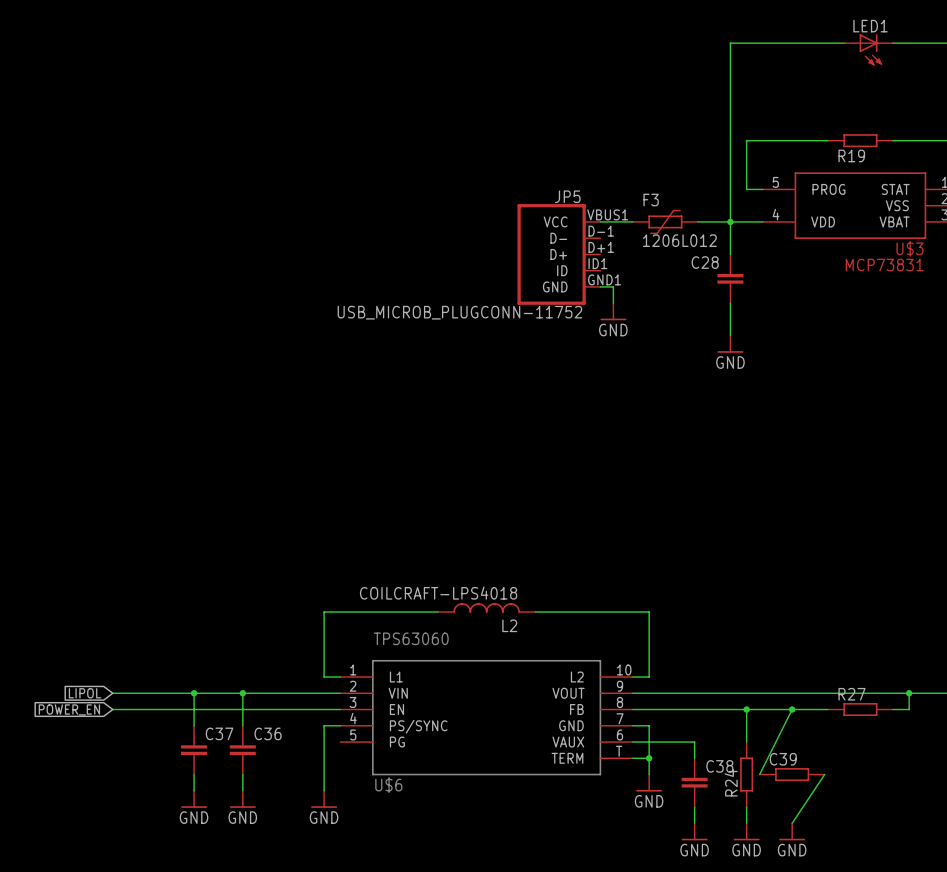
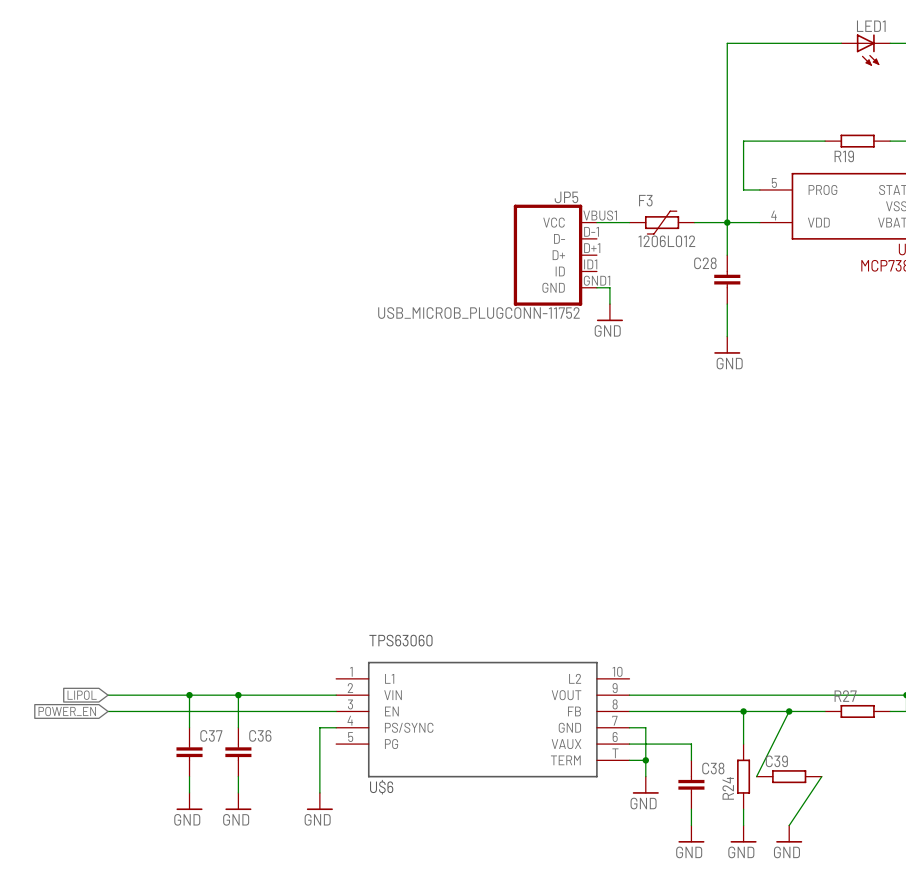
L2: COILCRAFT-LPS4018 (486, 607) -> none
wire: (437, 612) (324, 612) (324, 677) (340, 677) -> none
wire: (535, 612) (649, 612) (649, 677) (632, 677) -> none

